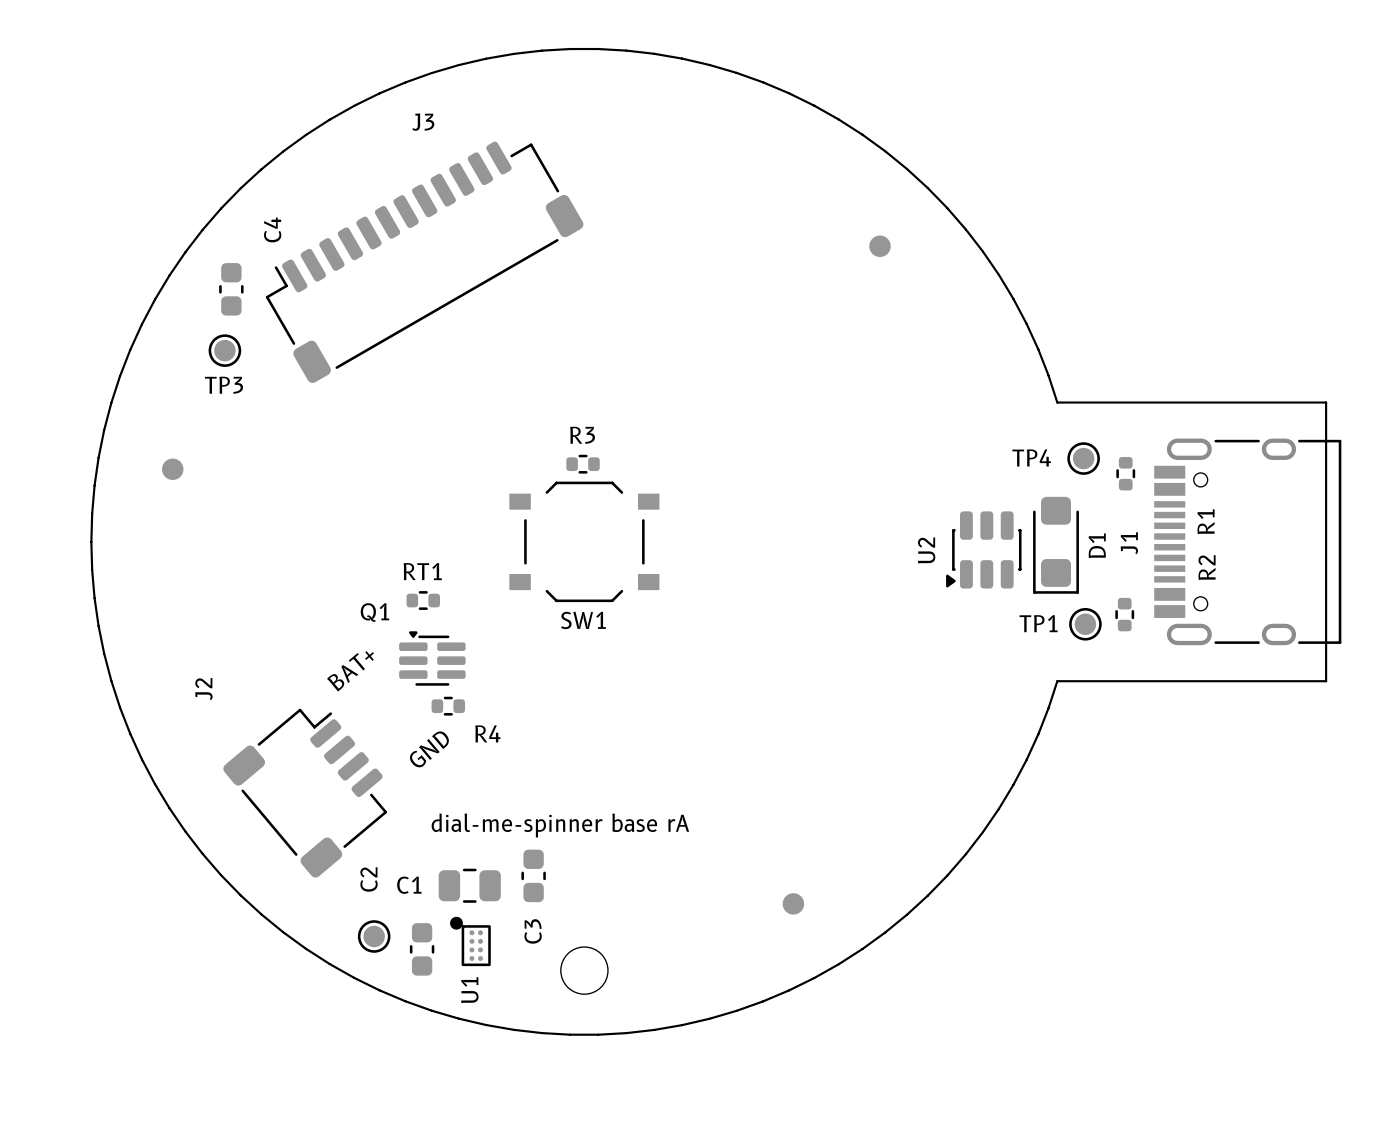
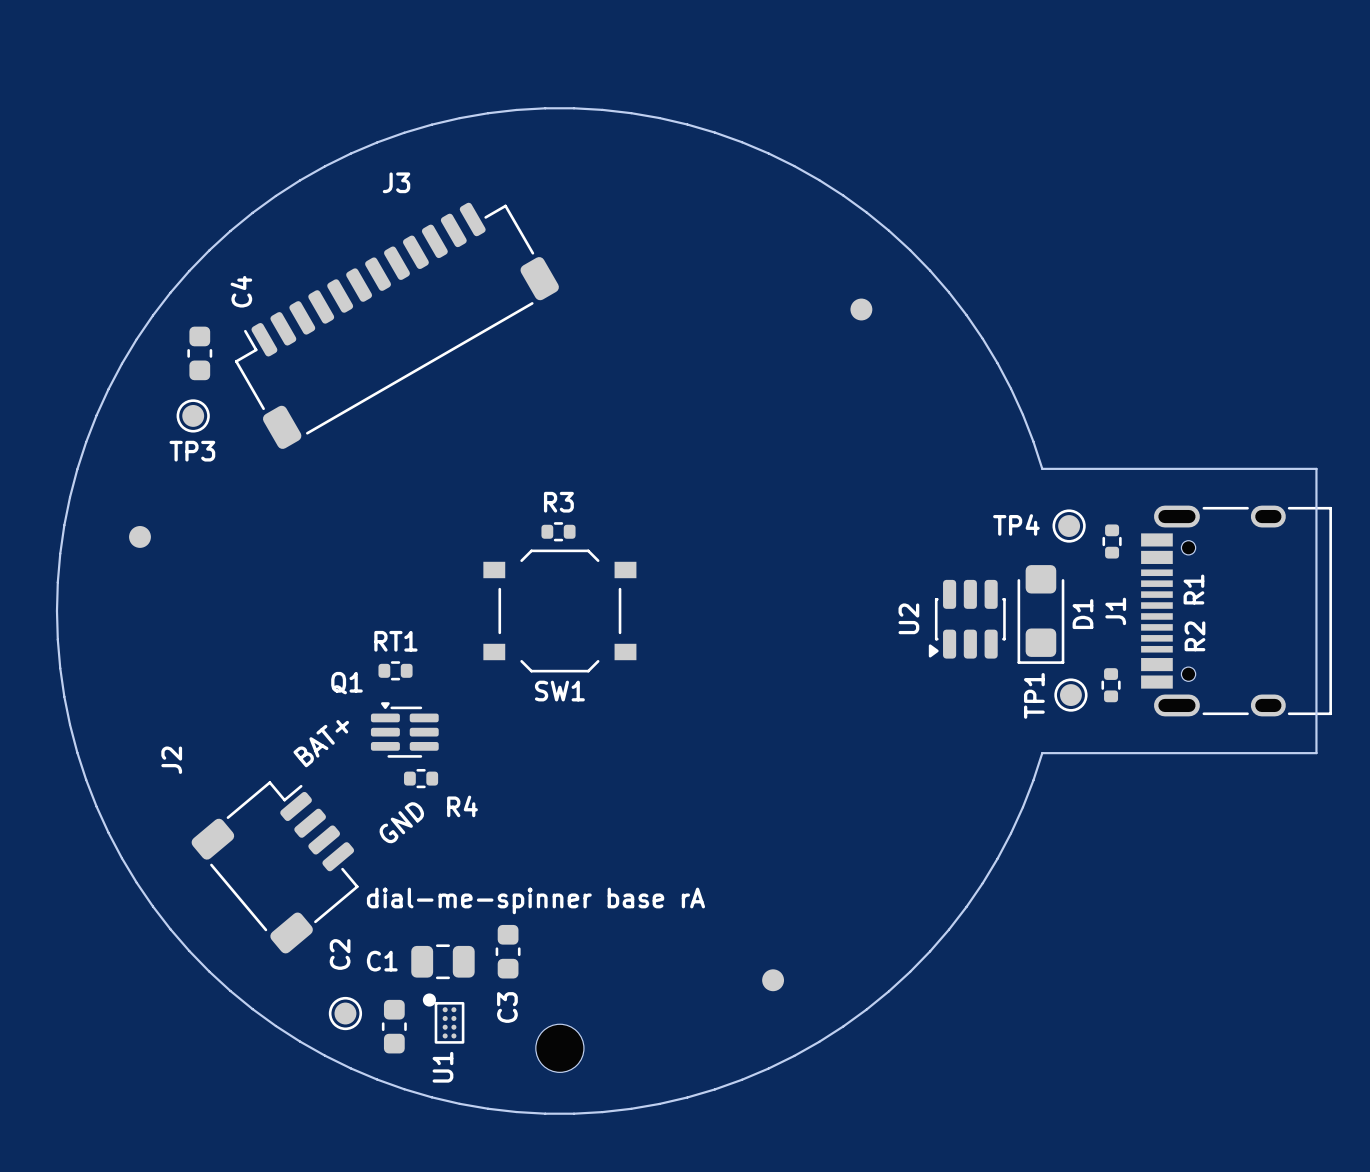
TP1 name rotation: 0° (1038, 623) -> 90° counterclockwise (1034, 695)

